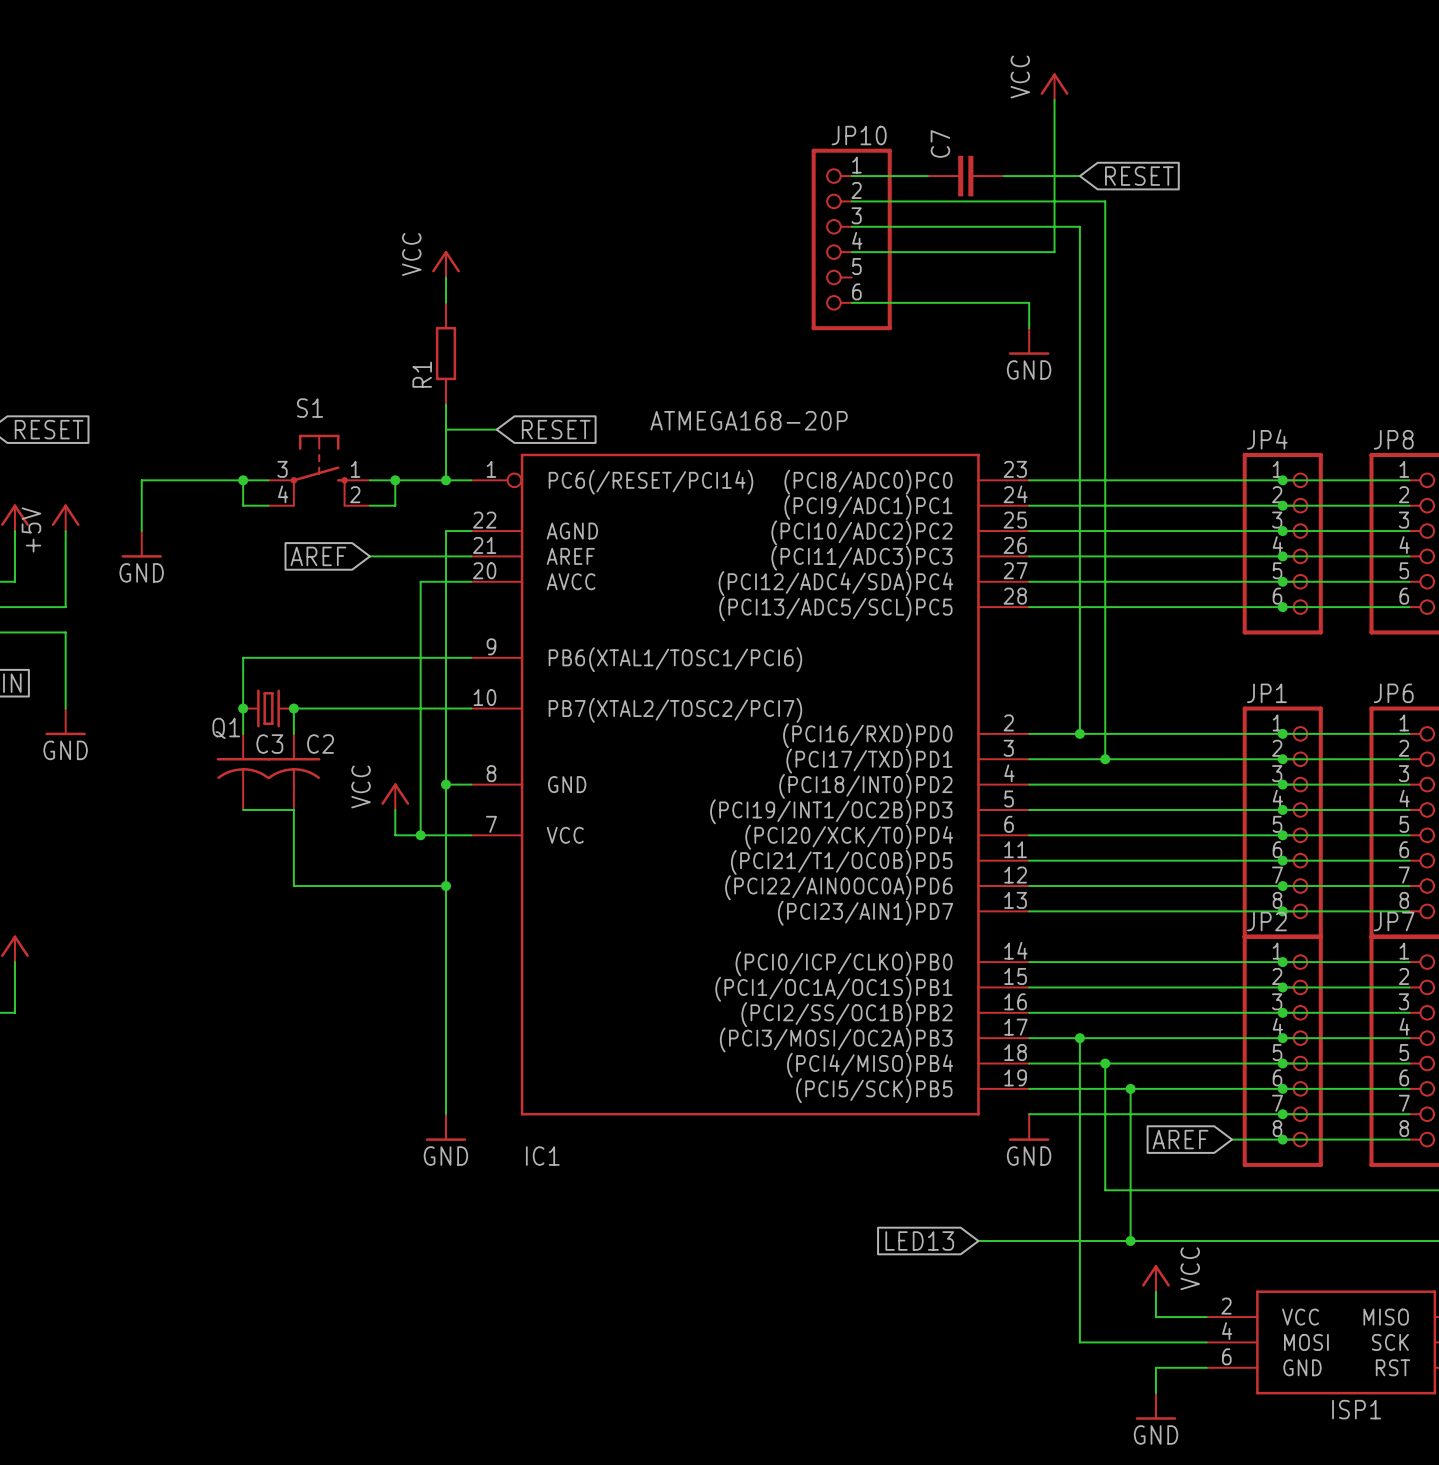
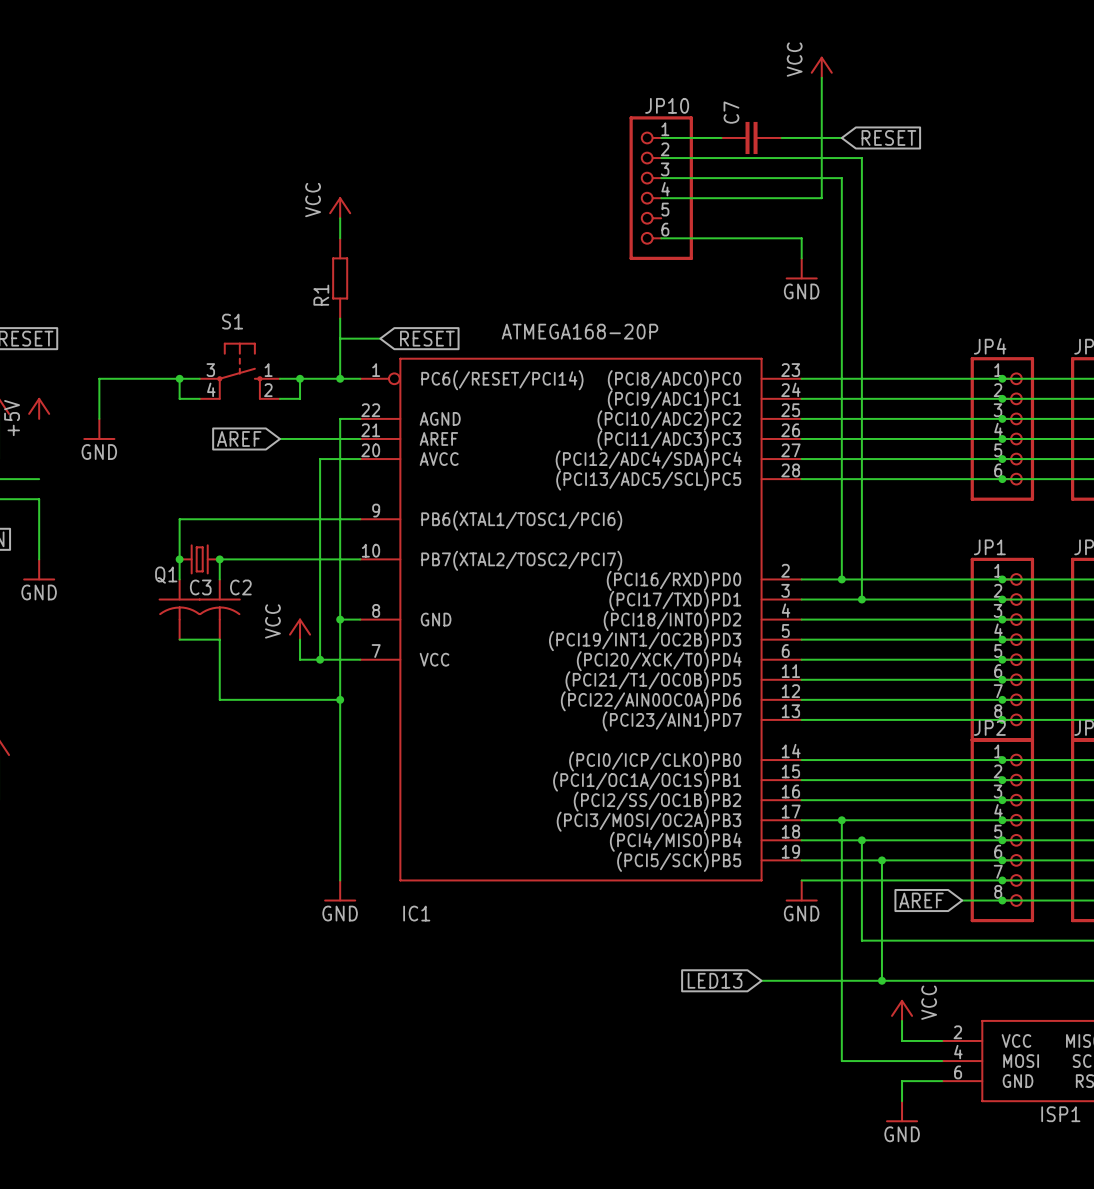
wire: (65, 531) (65, 607) -> none

